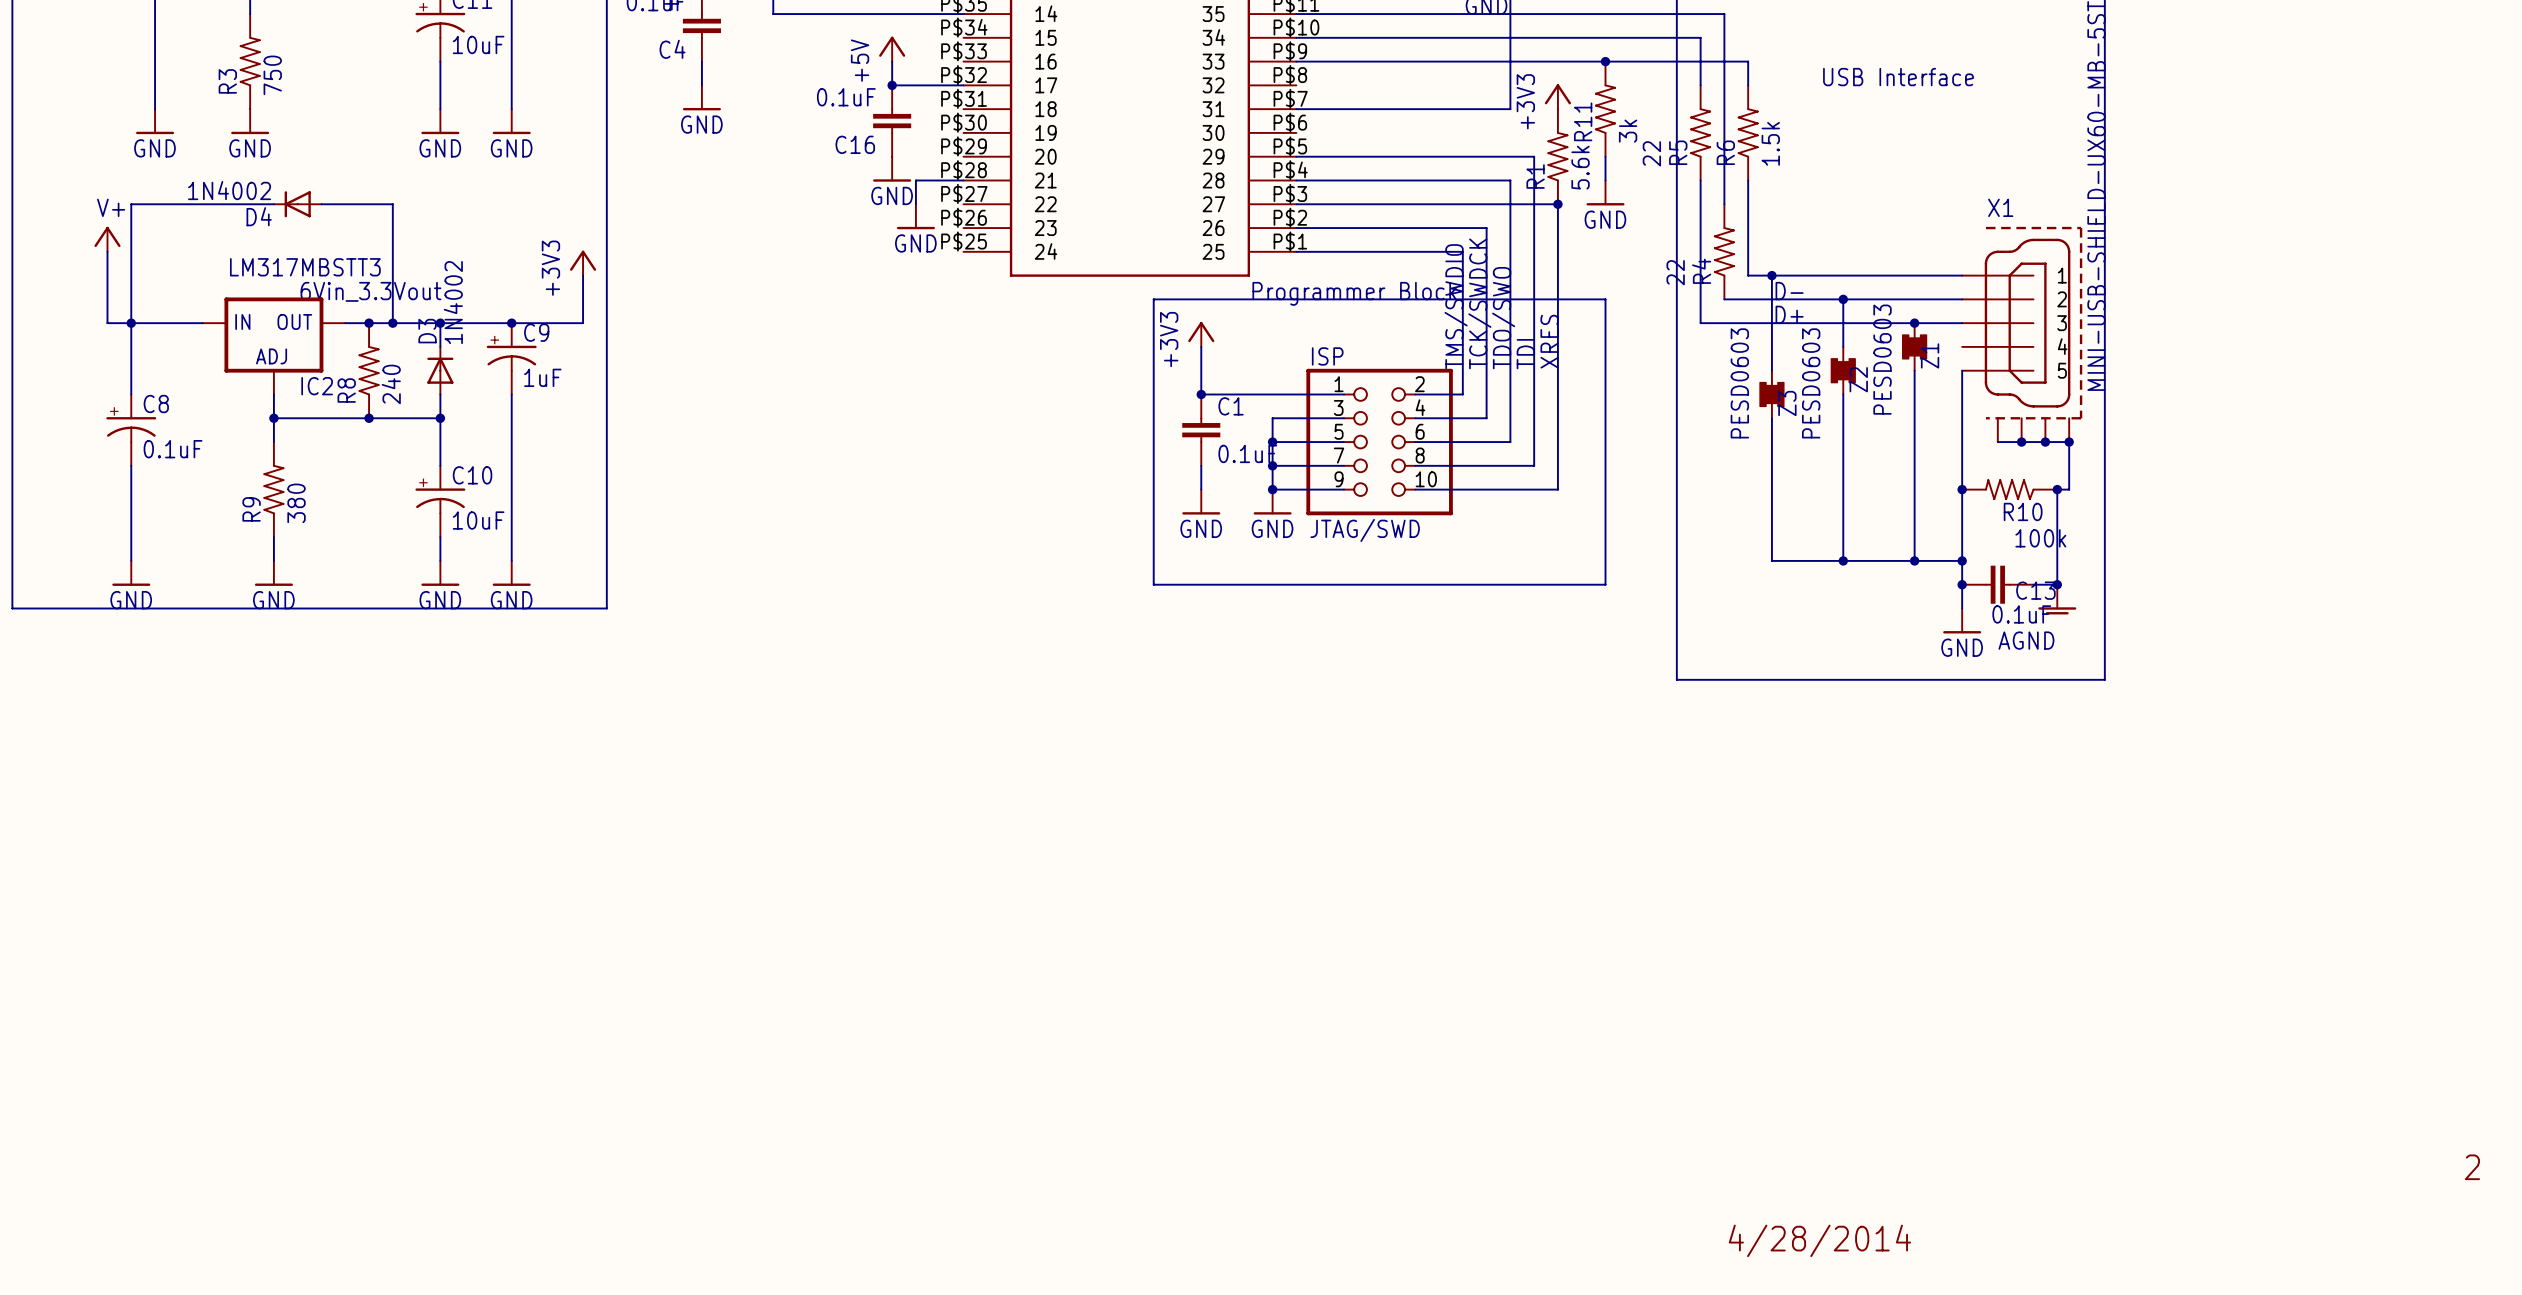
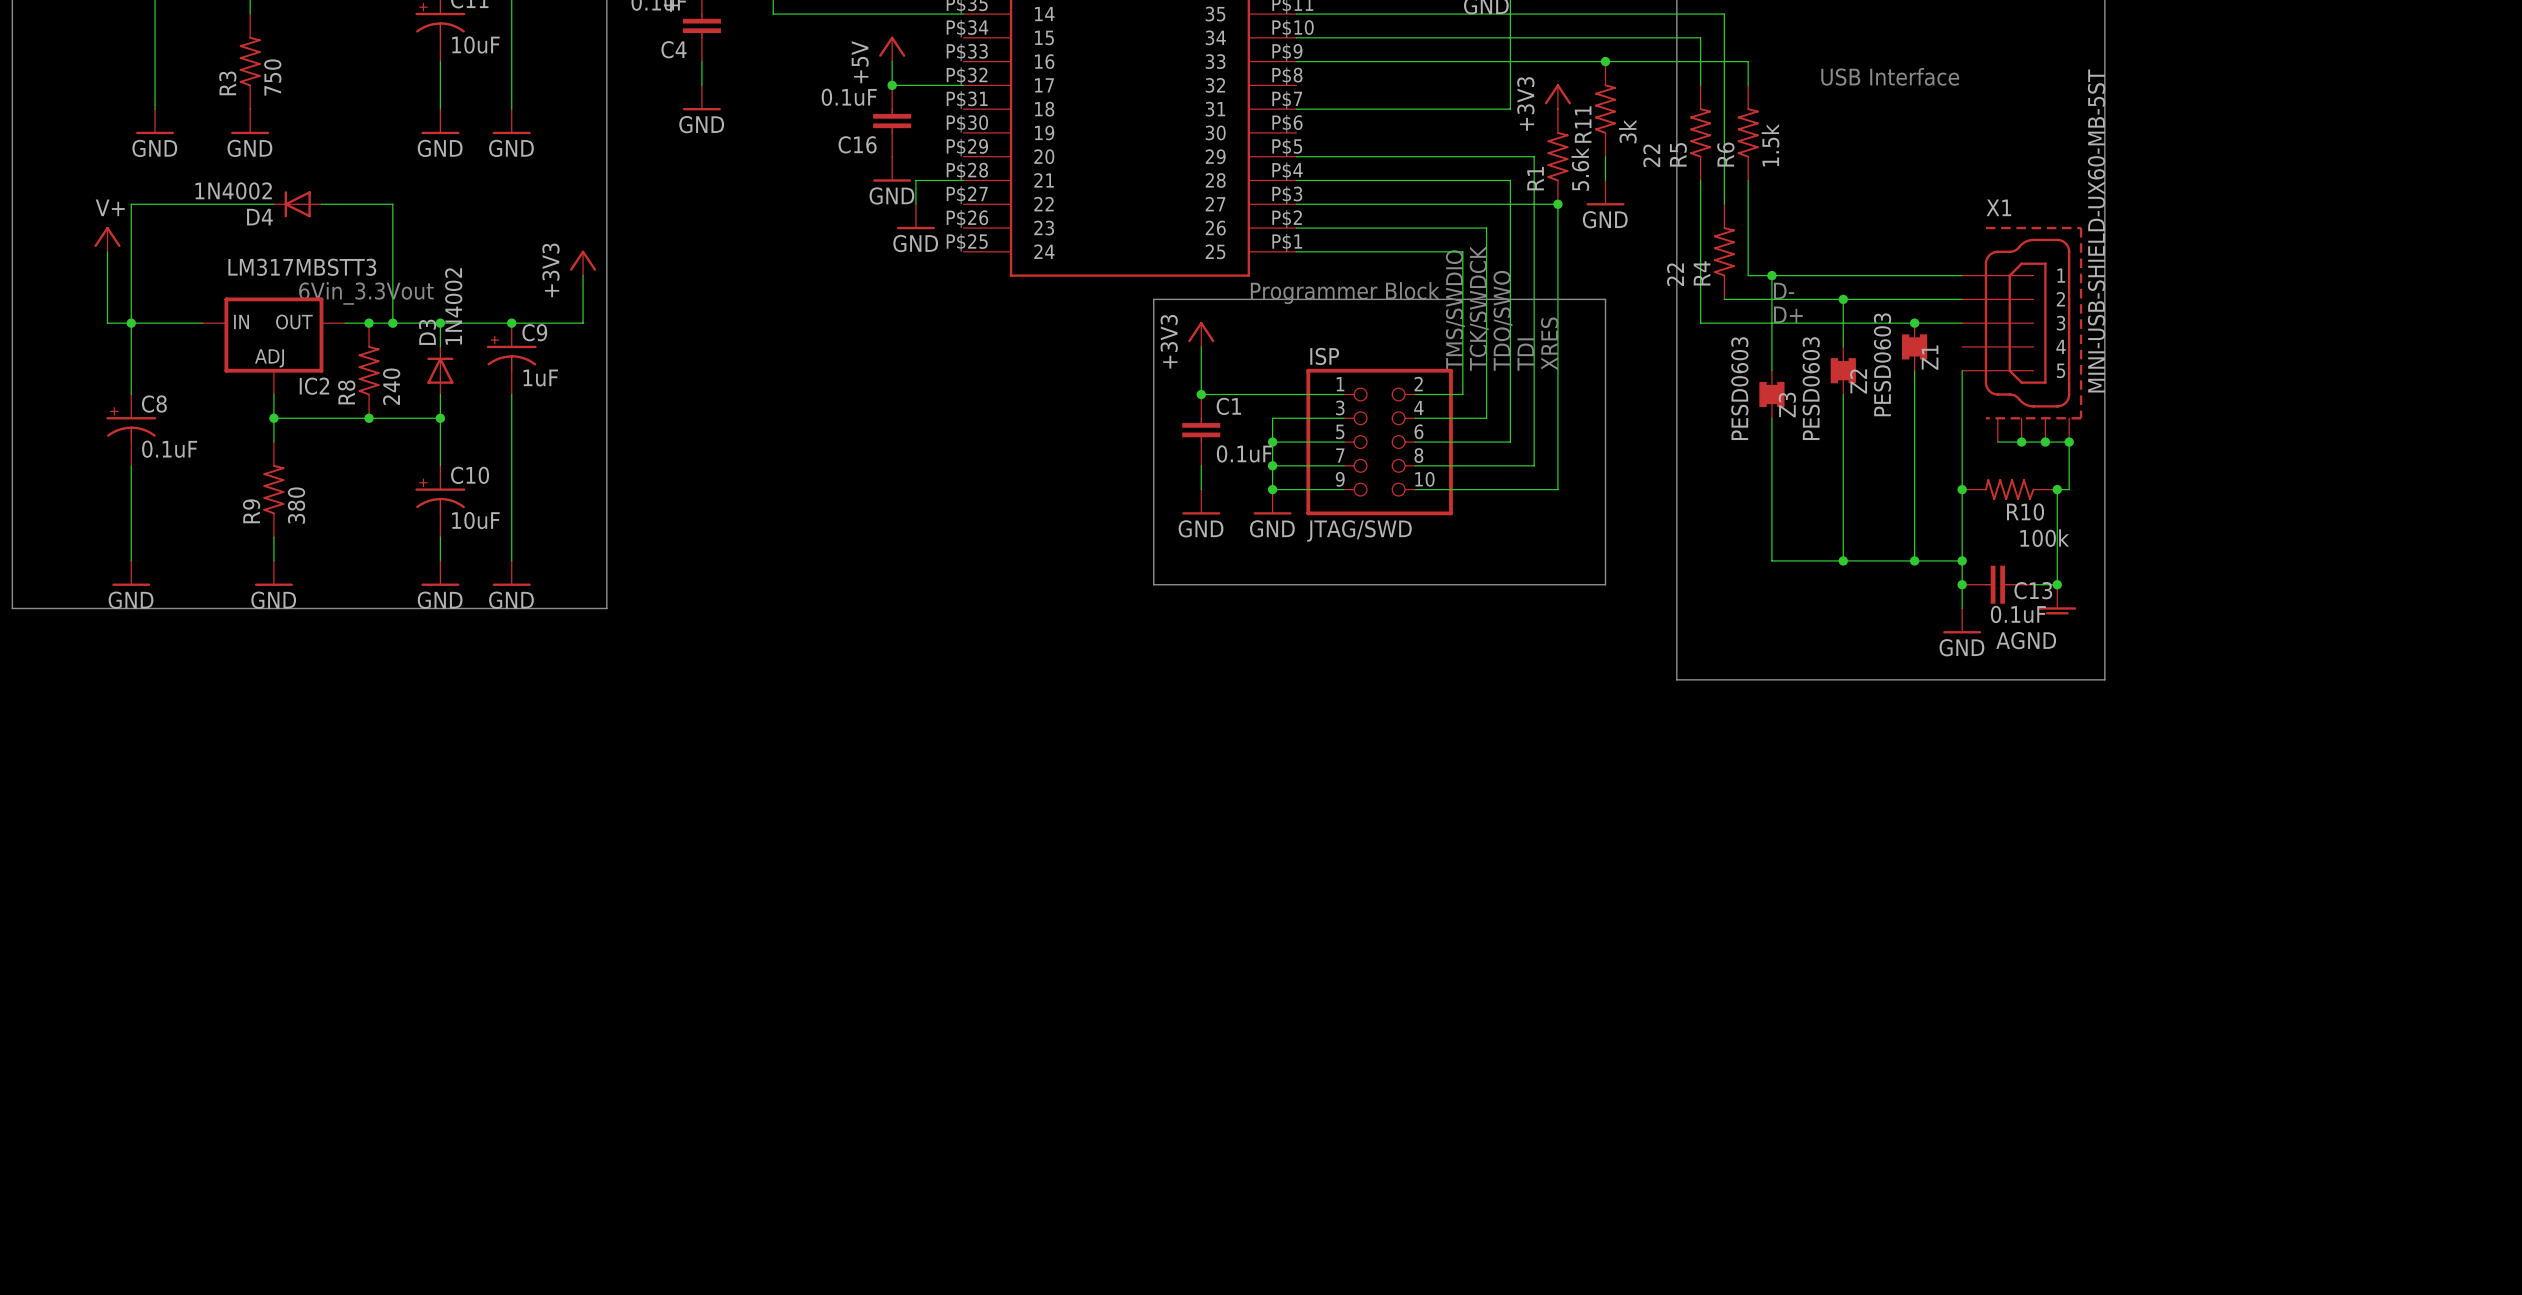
text: 2 (2472, 1167) -> none
text: 4/28/2014 (1819, 1240) -> none

